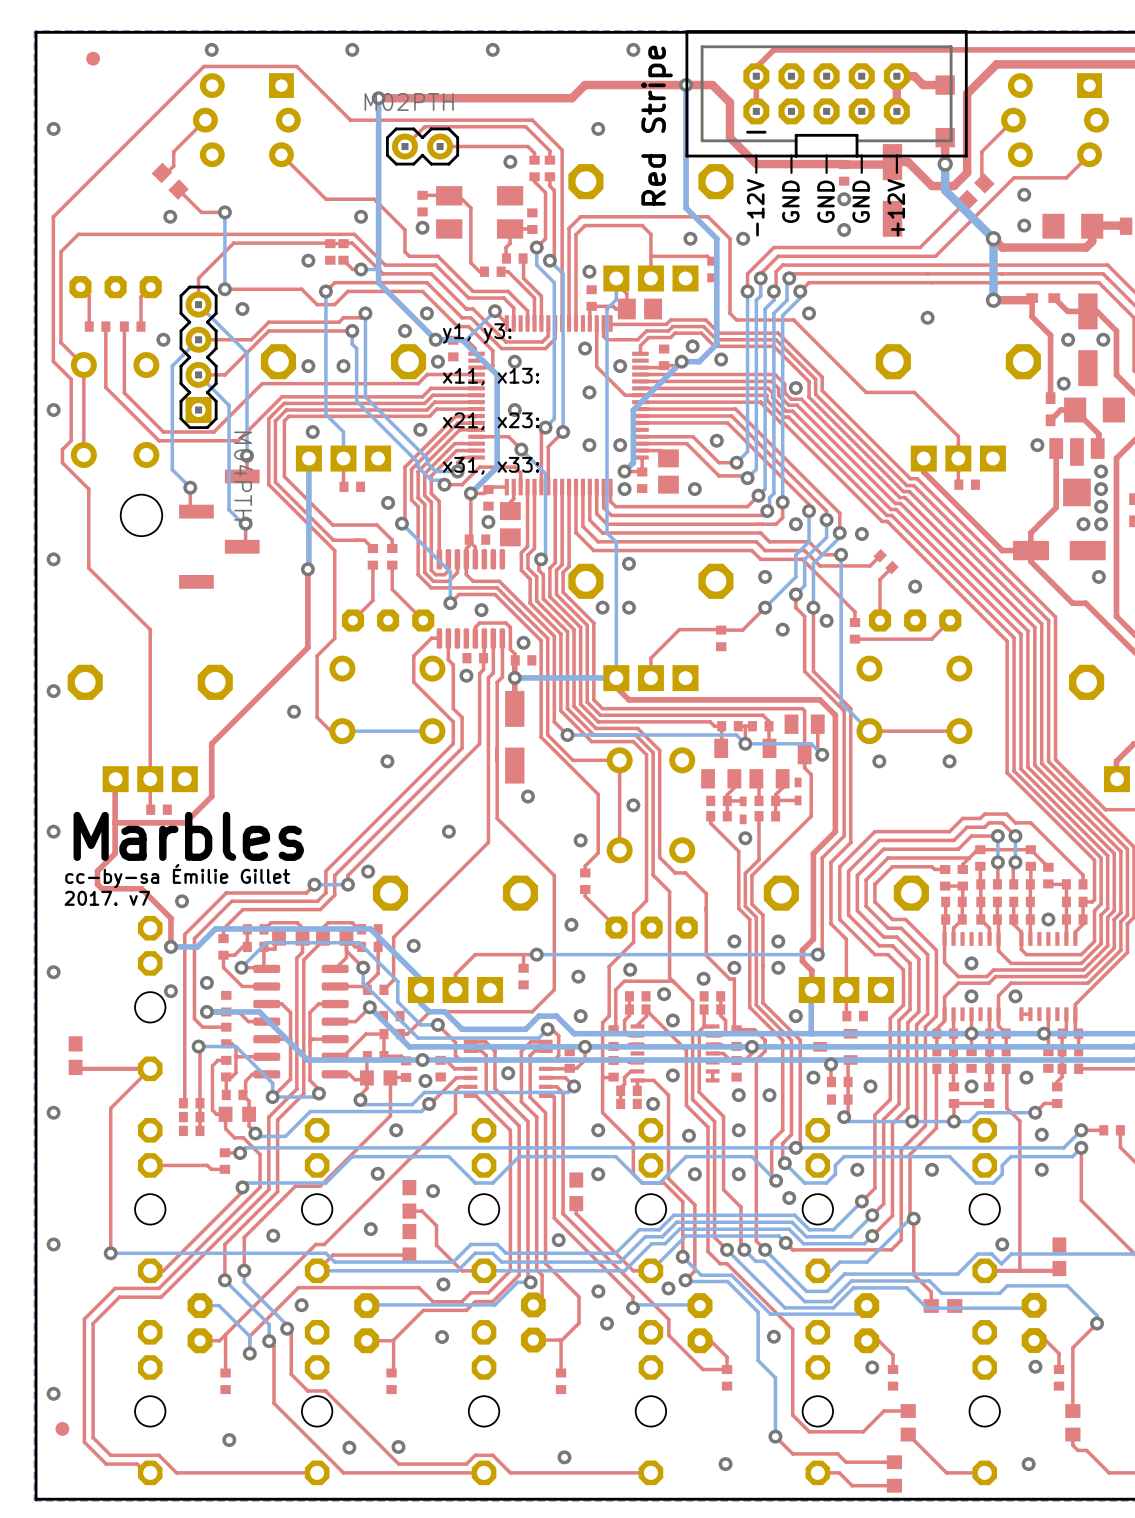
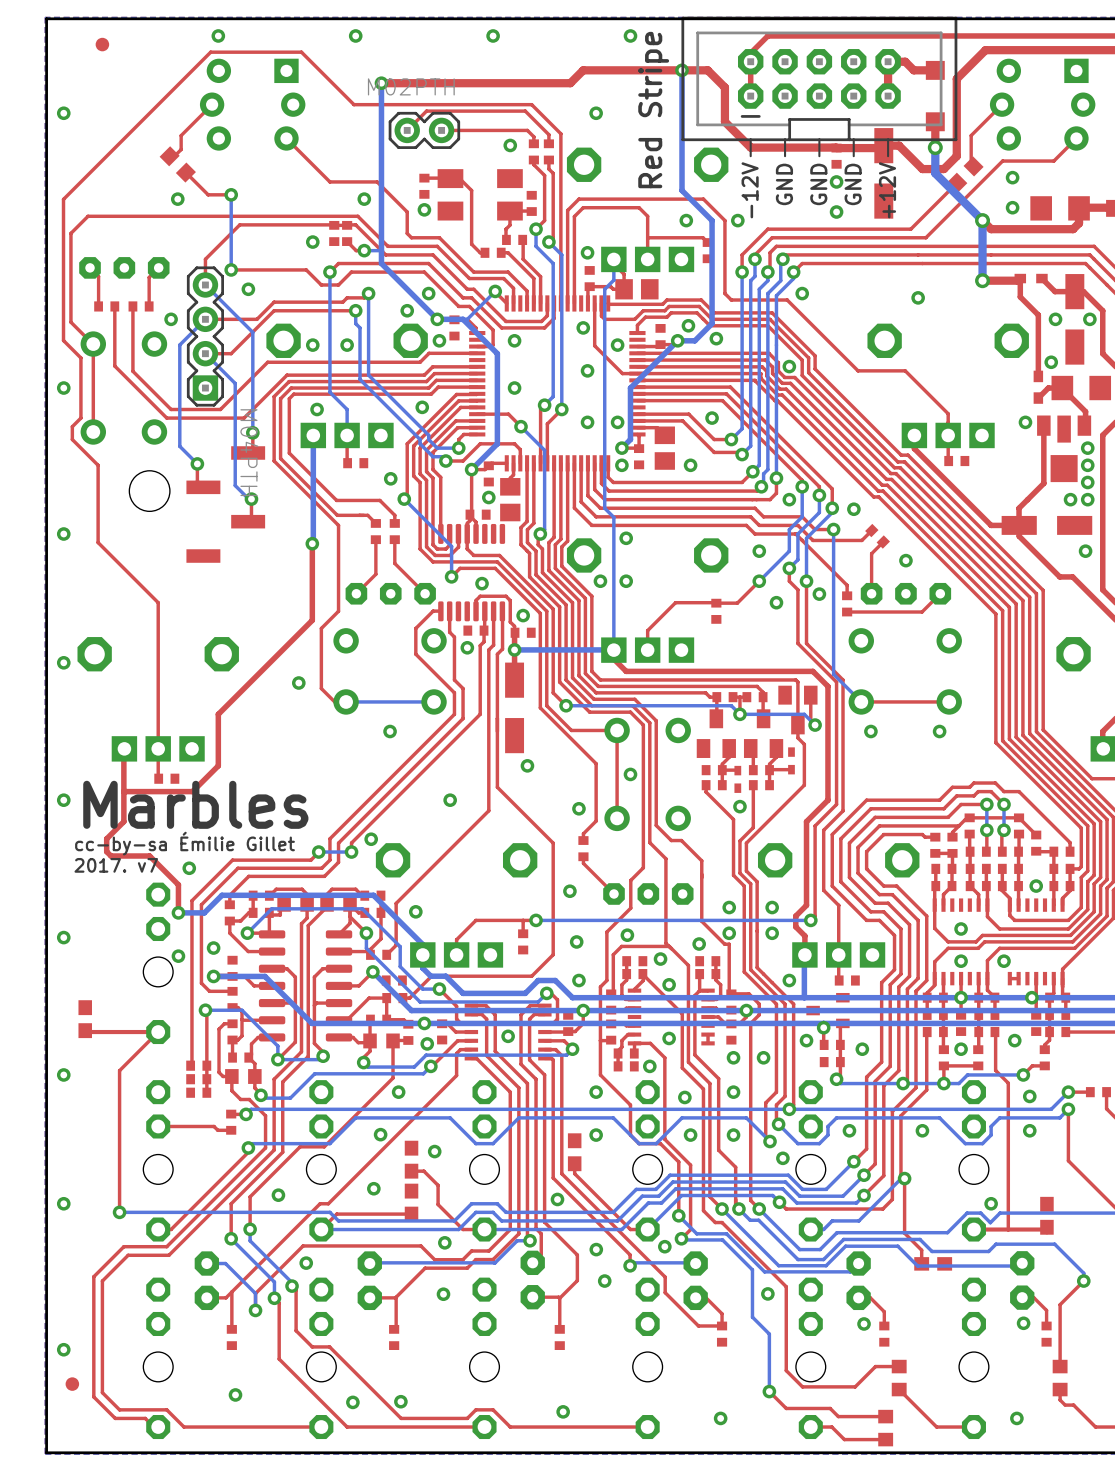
text: y1, y3: (477, 333) -> none
text: x11, x13: (491, 376) -> none
text: x21, x23: (491, 421) -> none
text: x31, x33: (491, 465) -> none

